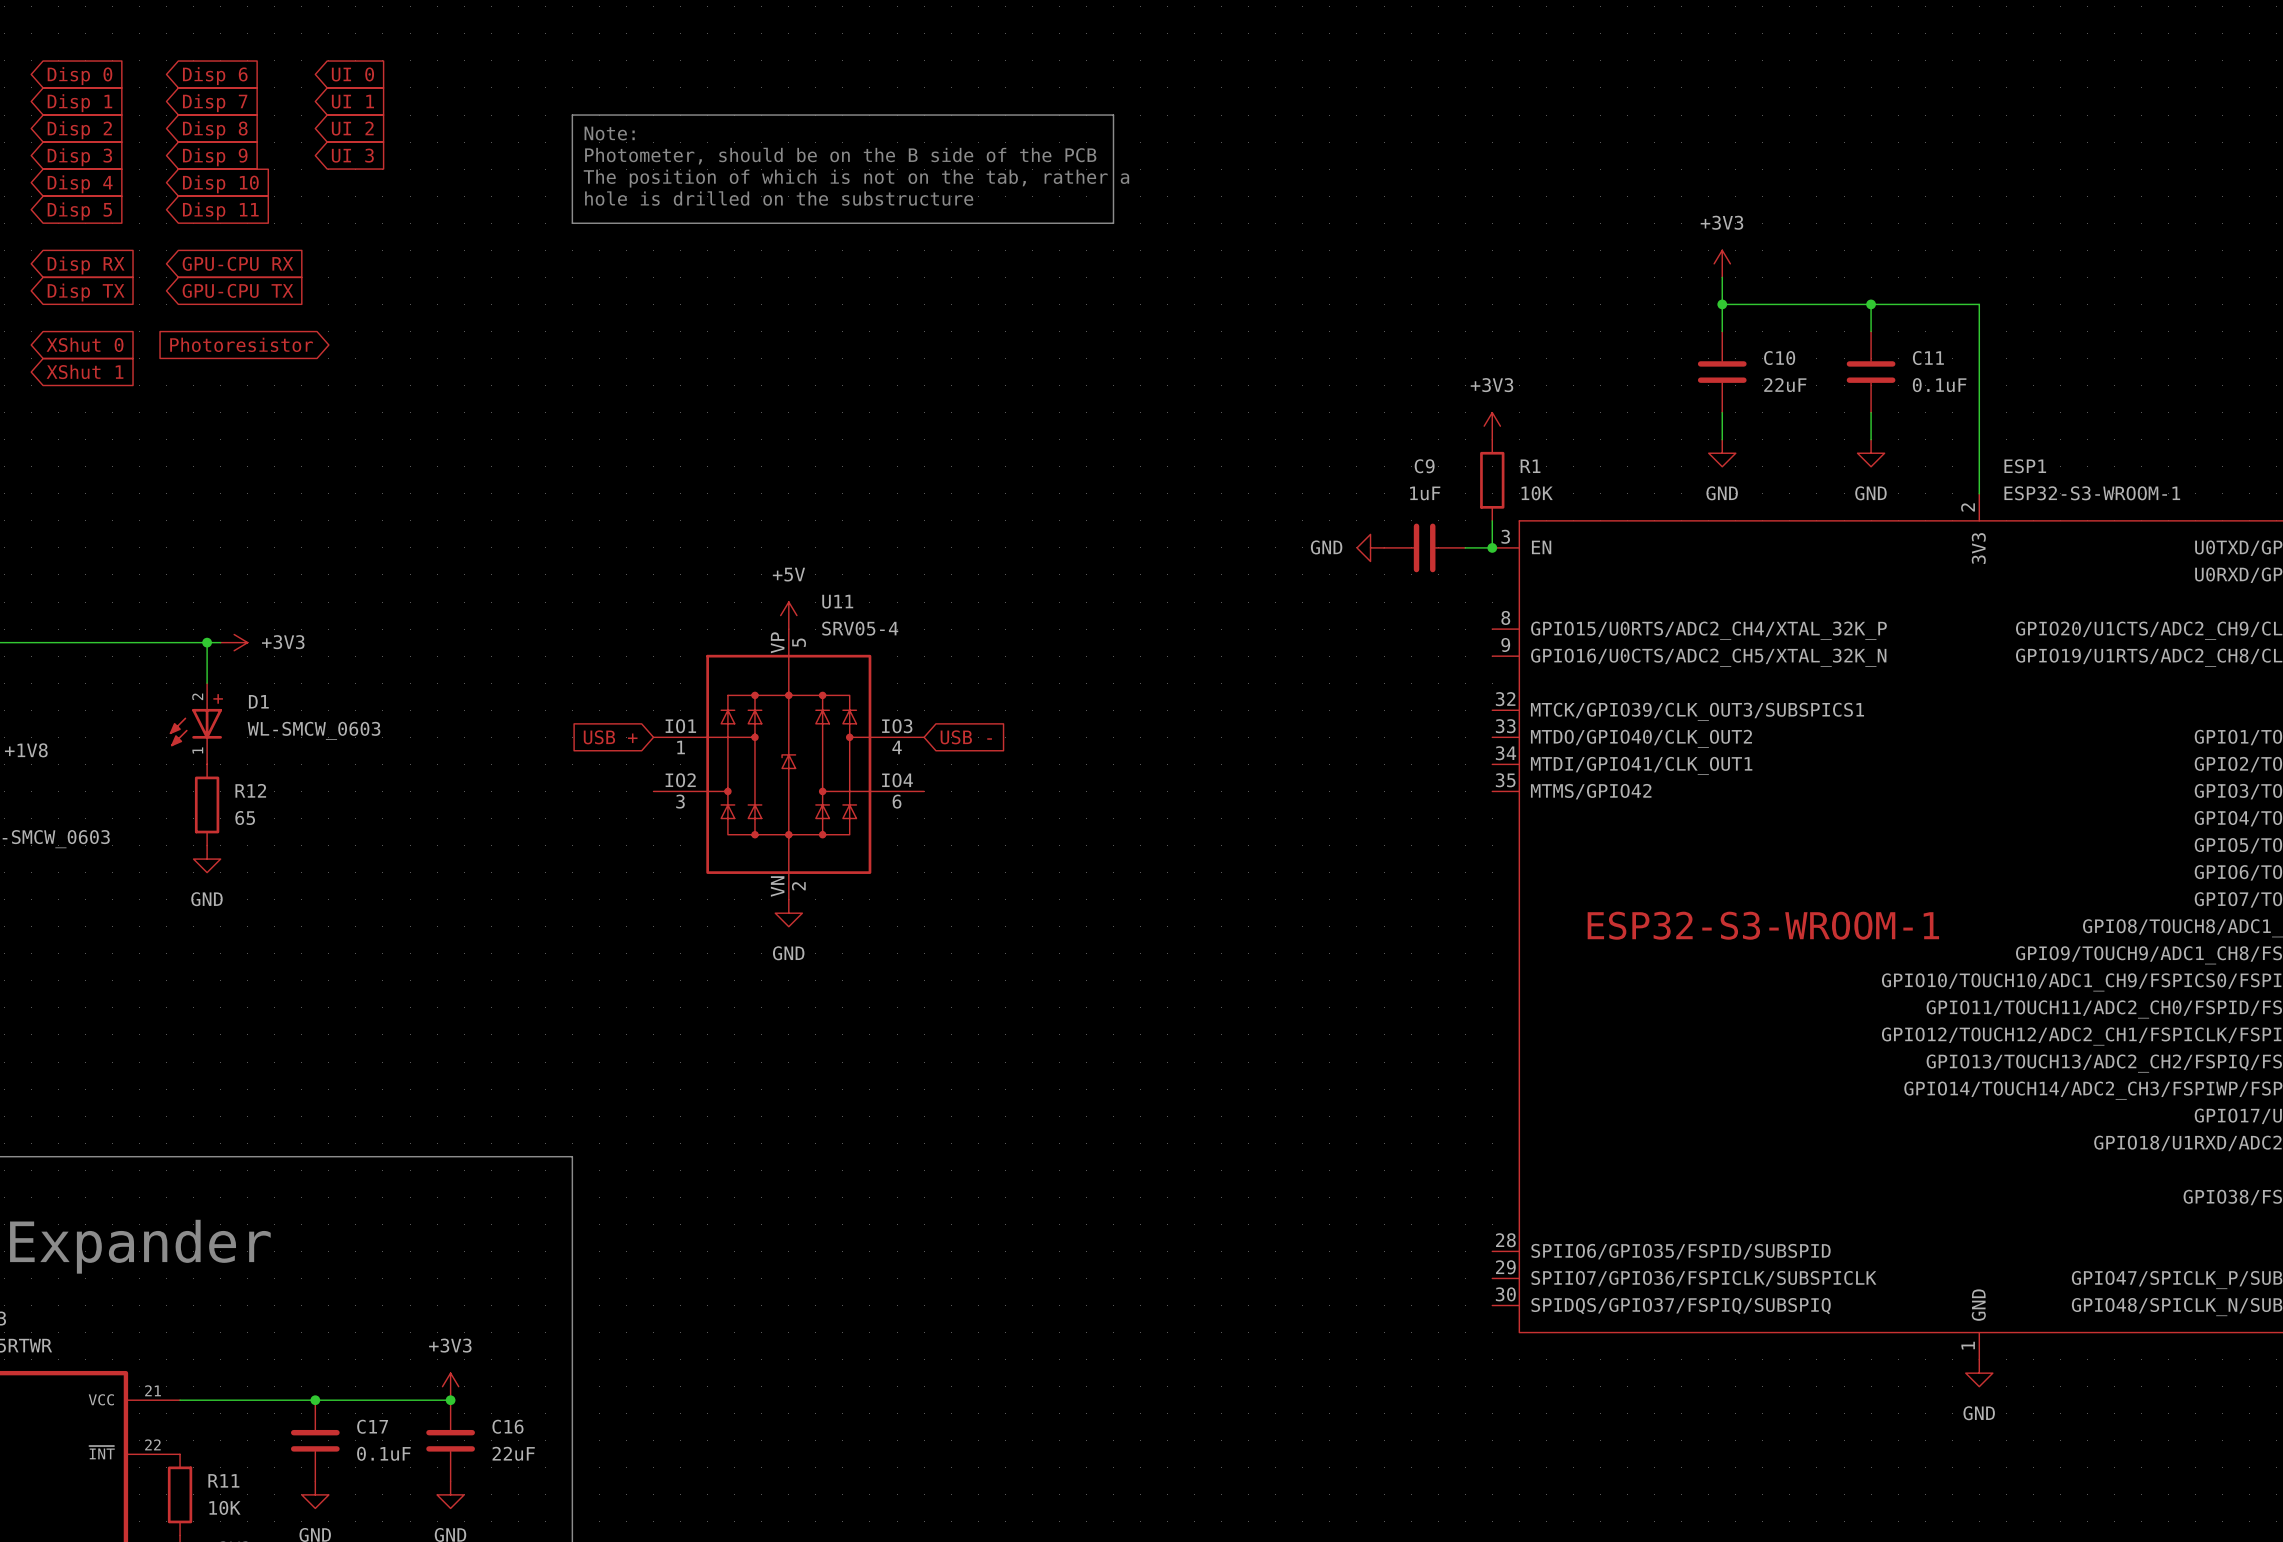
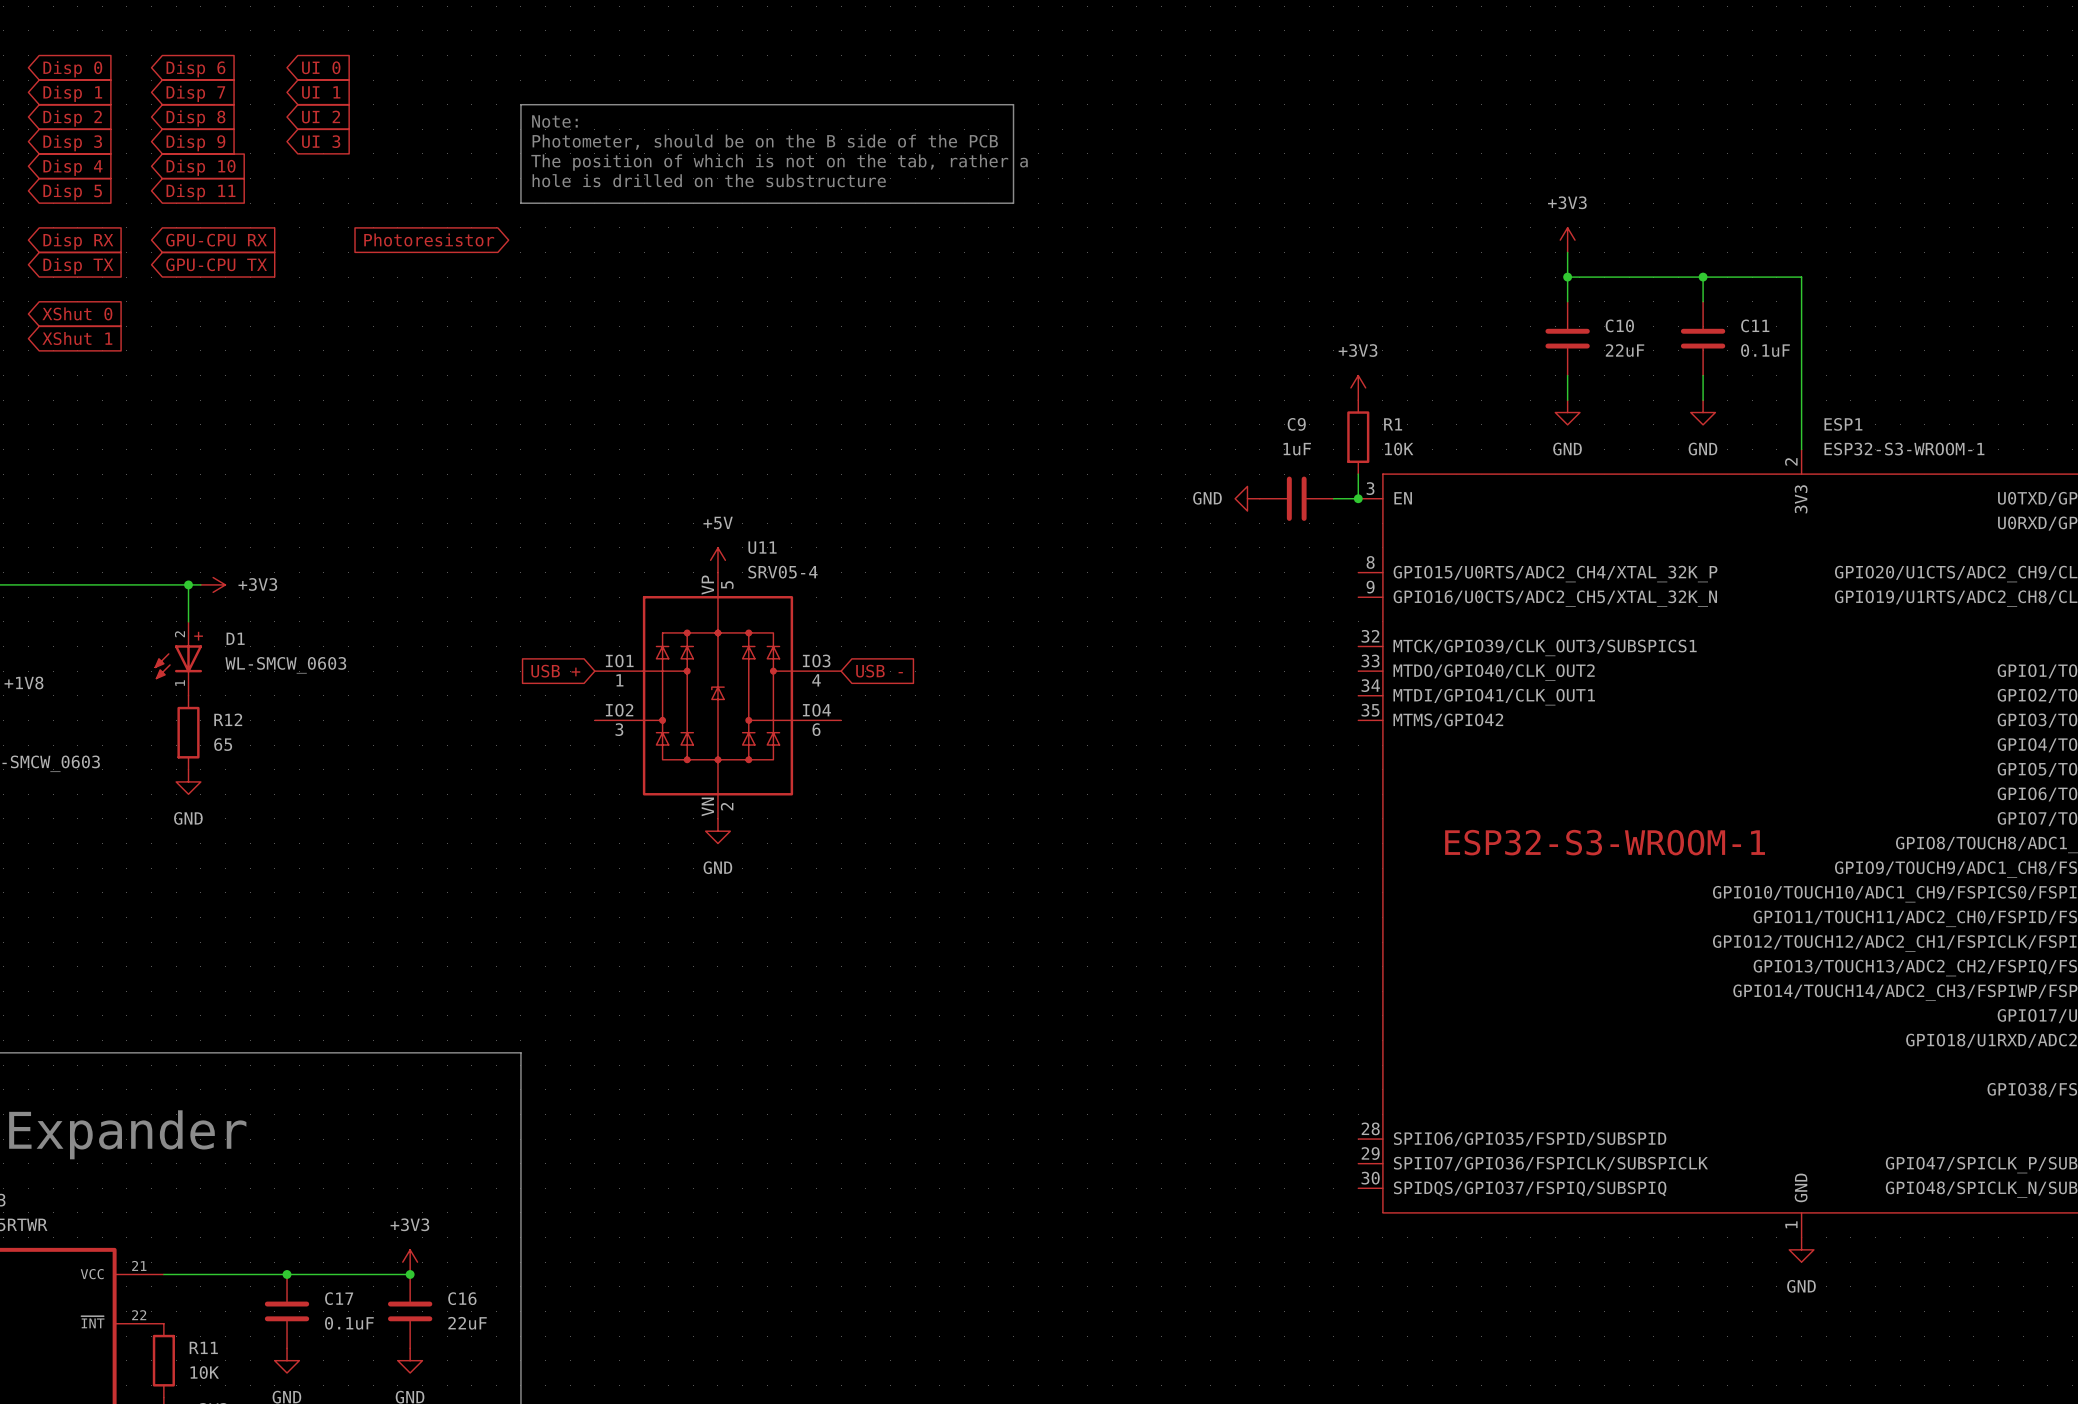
global label position: Photoresistor (241, 344) -> Photoresistor (429, 240)

